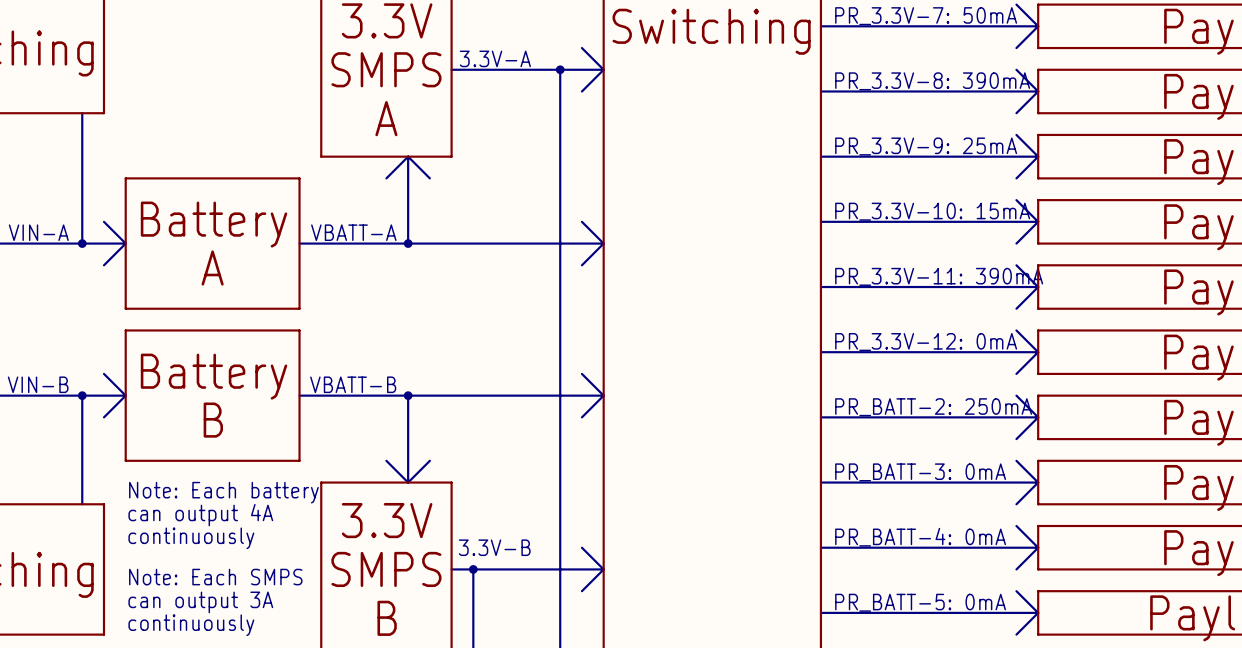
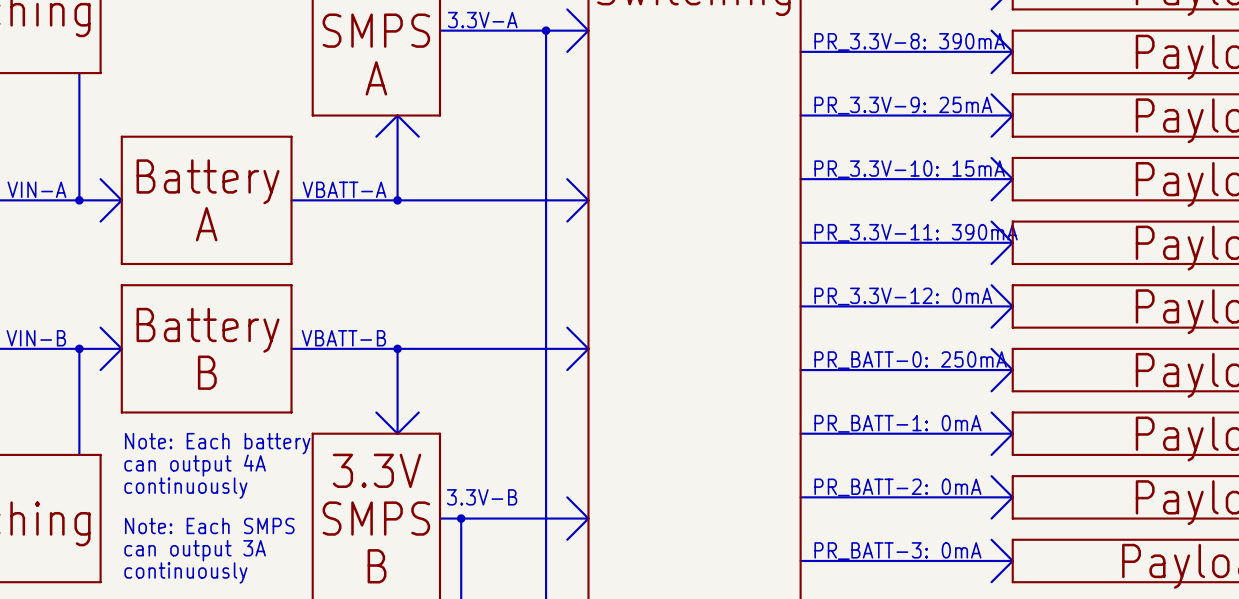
text: PR_BATT-2: 250mA (933, 407) -> PR_BATT-0: 250mA (910, 360)
text: PR_BATT-3: 0mA (920, 472) -> PR_BATT-1: 0mA (897, 423)
text: PR_BATT-4: 0mA (920, 537) -> PR_BATT-2: 0mA (897, 487)
text: PR_BATT-5: 0mA (920, 602) -> PR_BATT-3: 0mA (897, 551)

